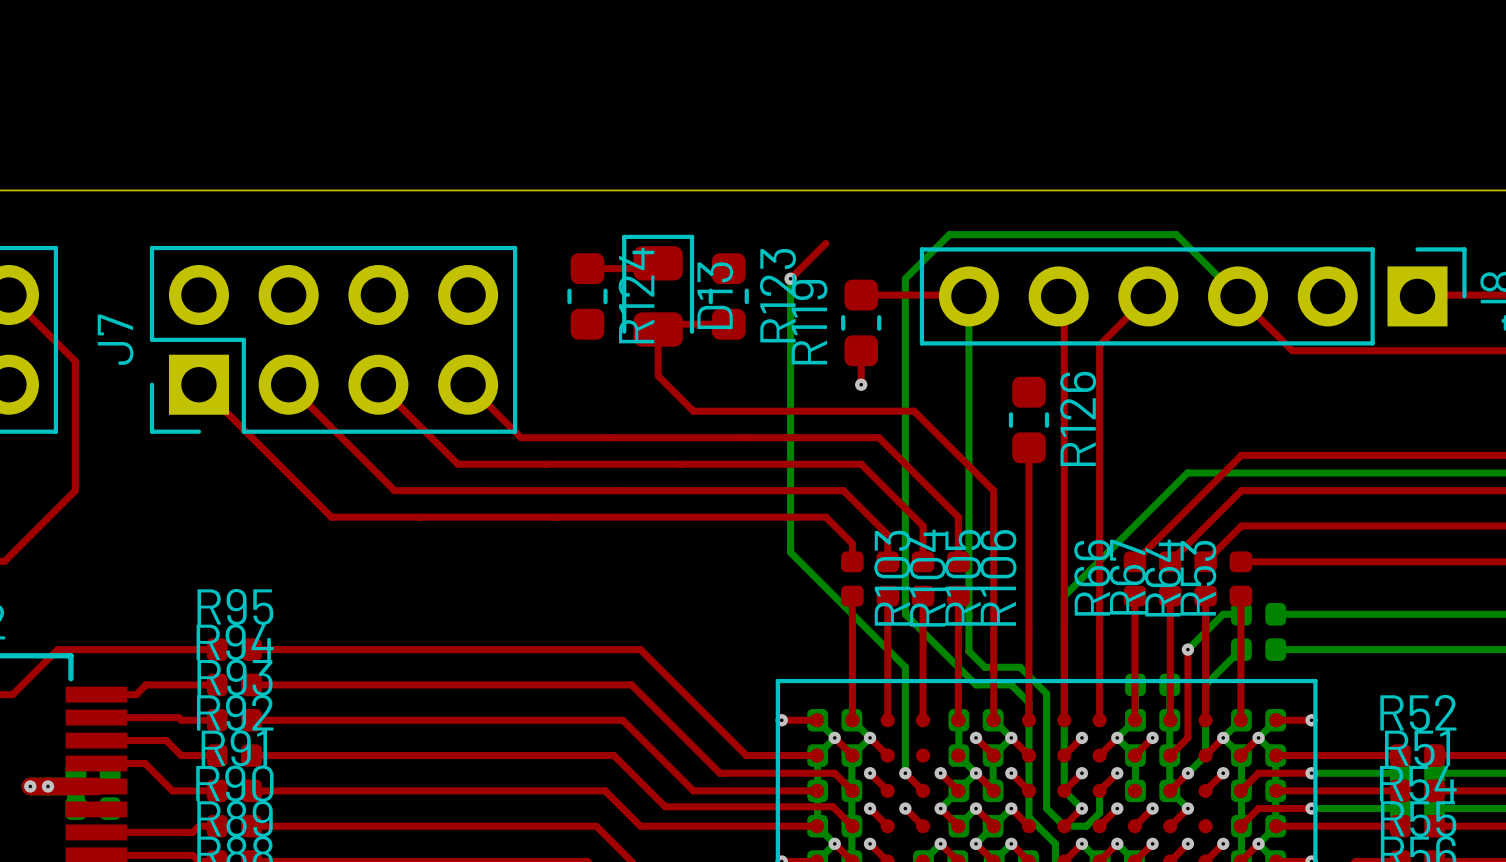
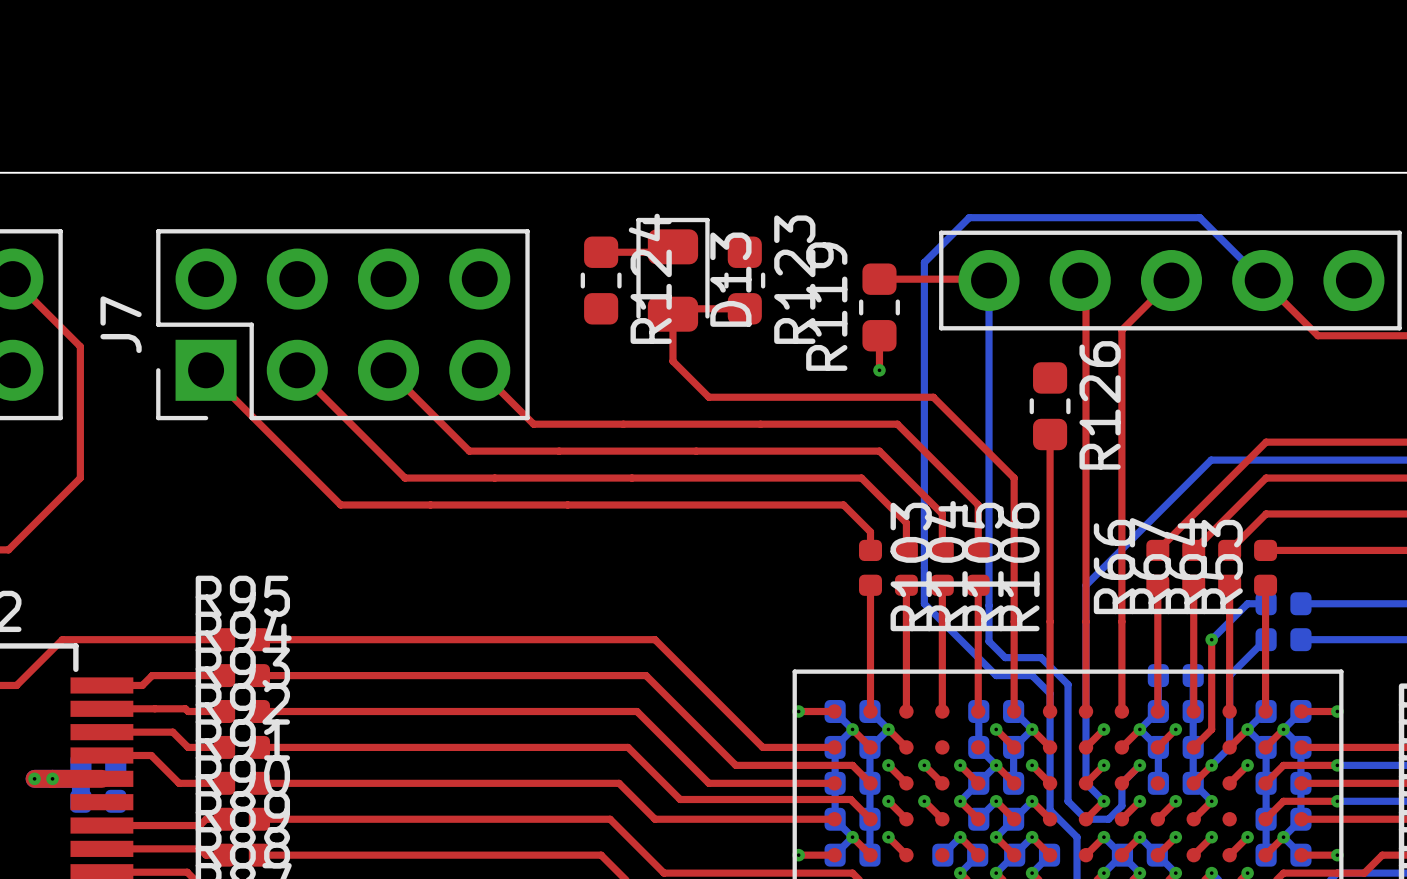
top track: (825, 243) (790, 278) -> none
bottom track: (790, 278) (790, 552) (905, 667) (905, 773) -> none
via: (790, 278) -> none

